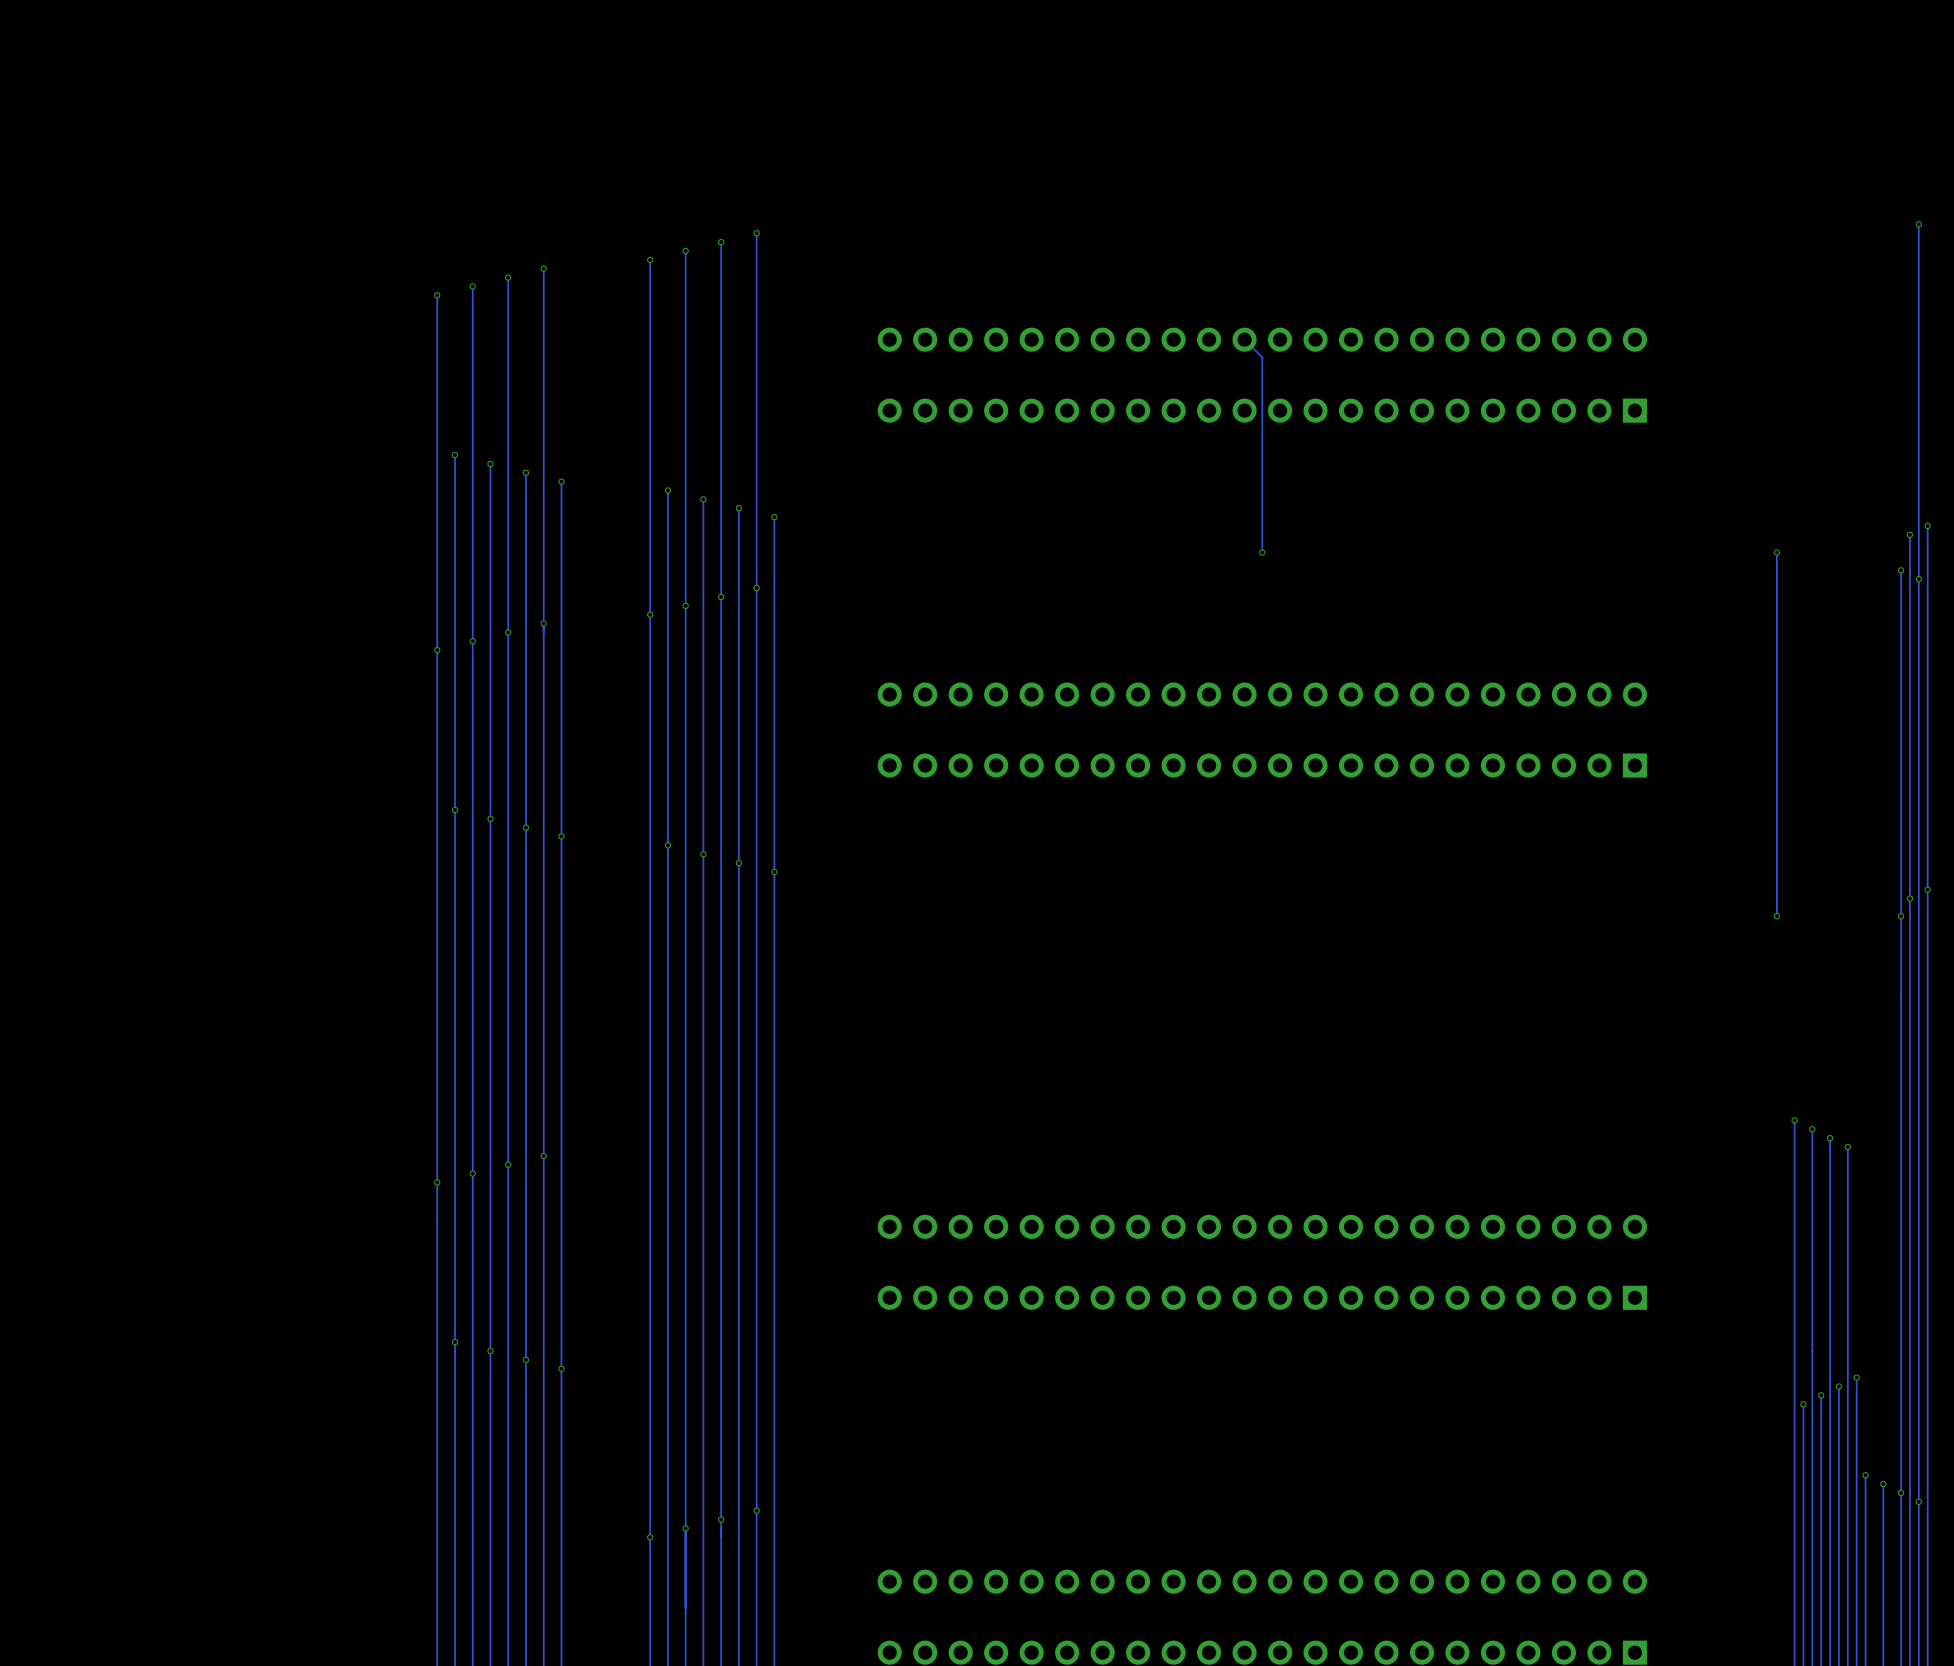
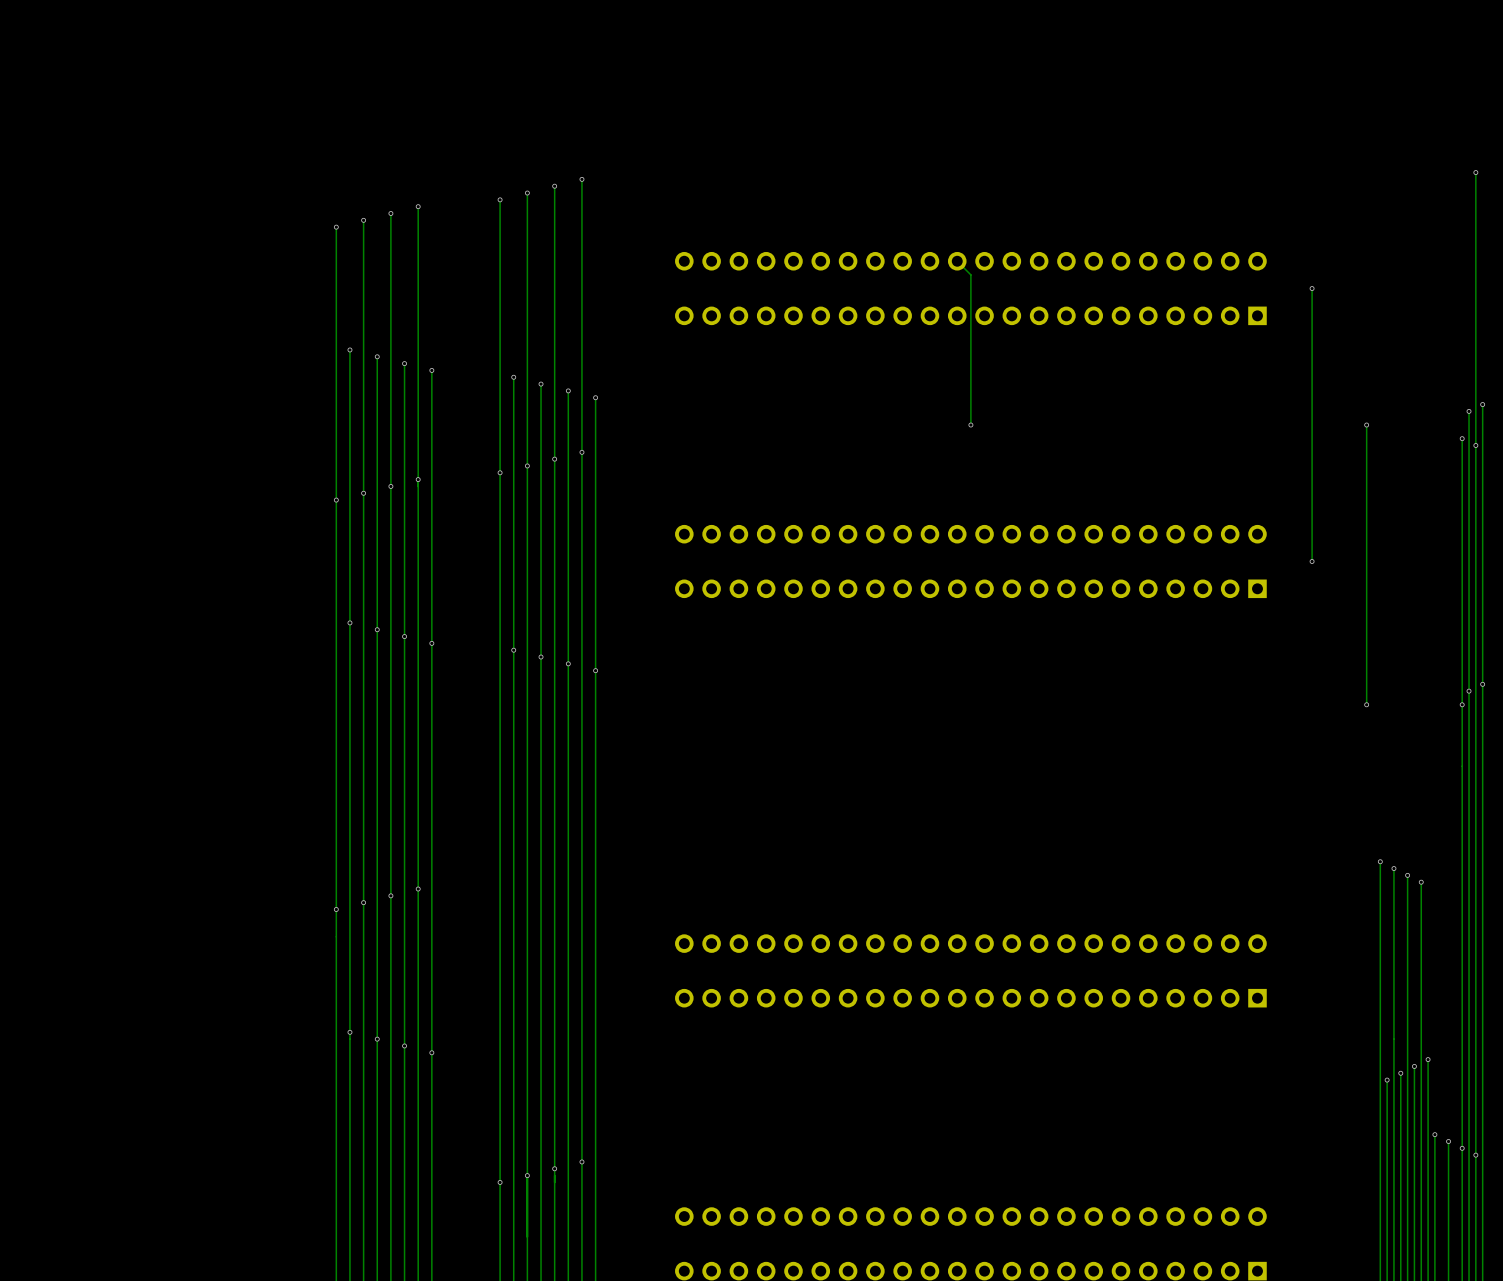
track: none -> (1312, 288) (1312, 561)
via: none -> (1312, 288)
via: none -> (1312, 561)

